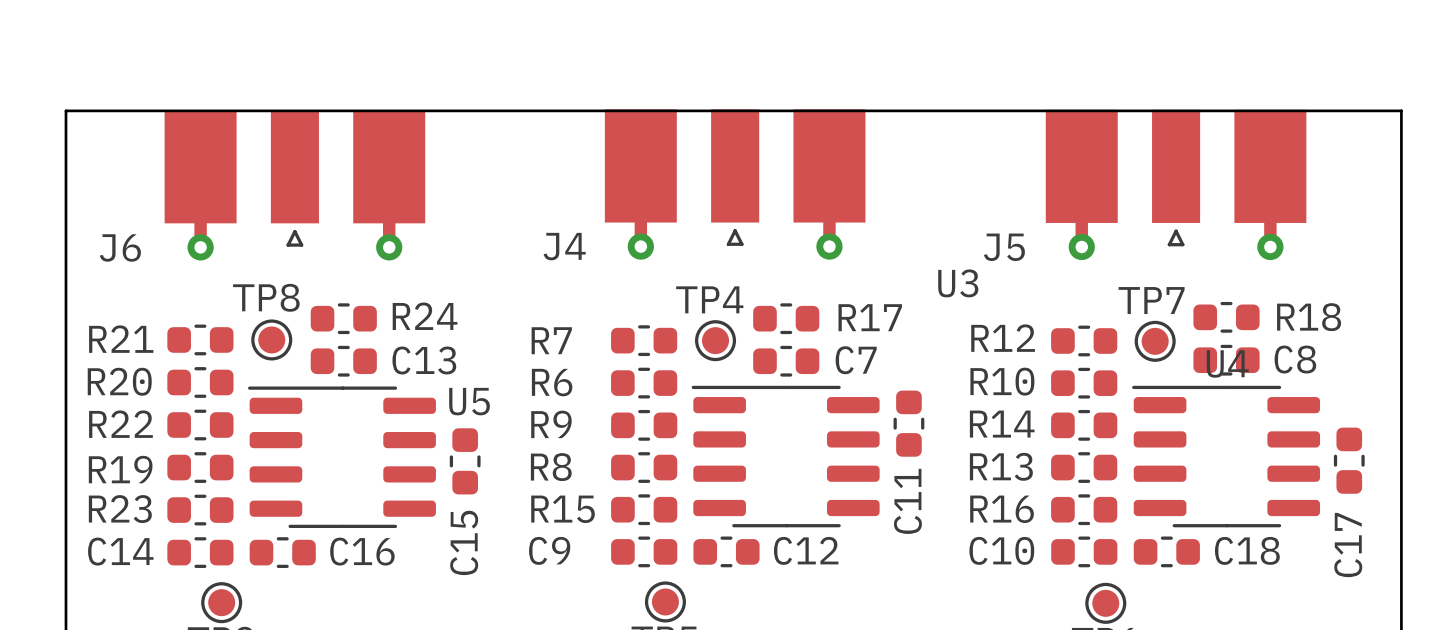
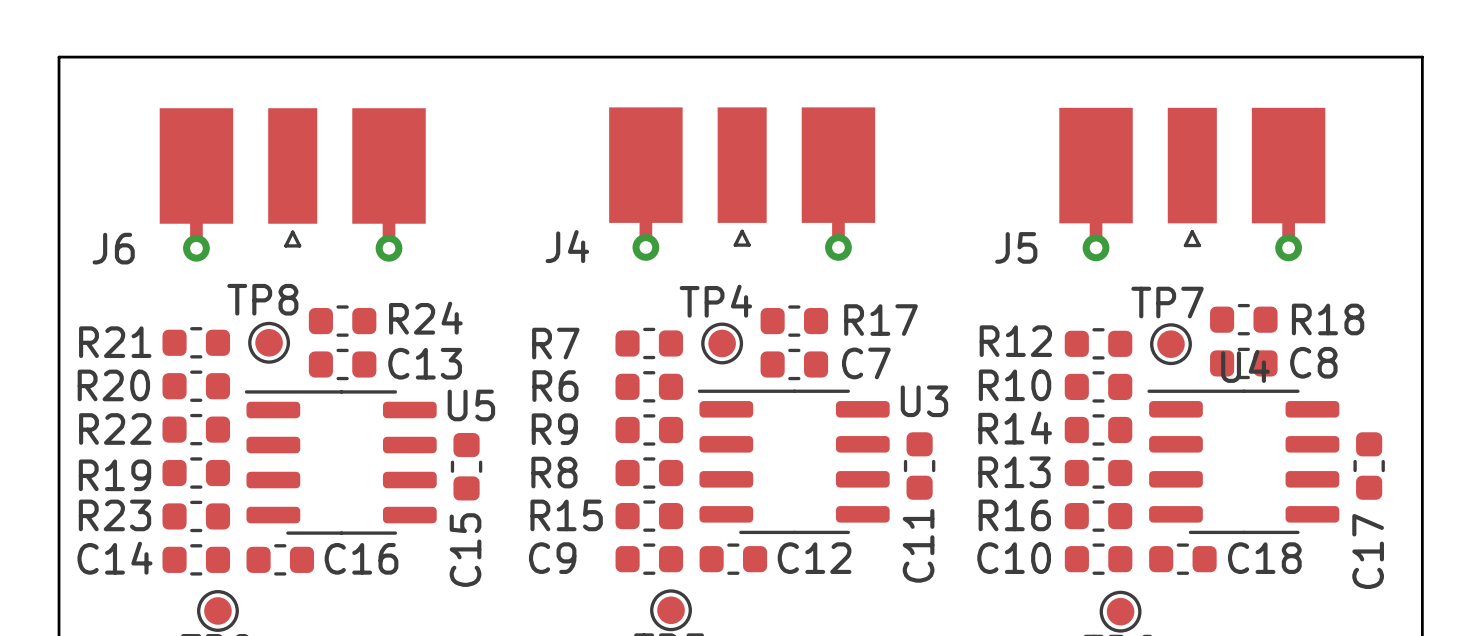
board edge: (65, 110) (1401, 110) -> (59, 108) (59, 57) (1422, 57) (1422, 108)
U3 name position: U3 (958, 283) -> U3 (924, 401)
C11 position: (908, 423) -> (919, 466)

